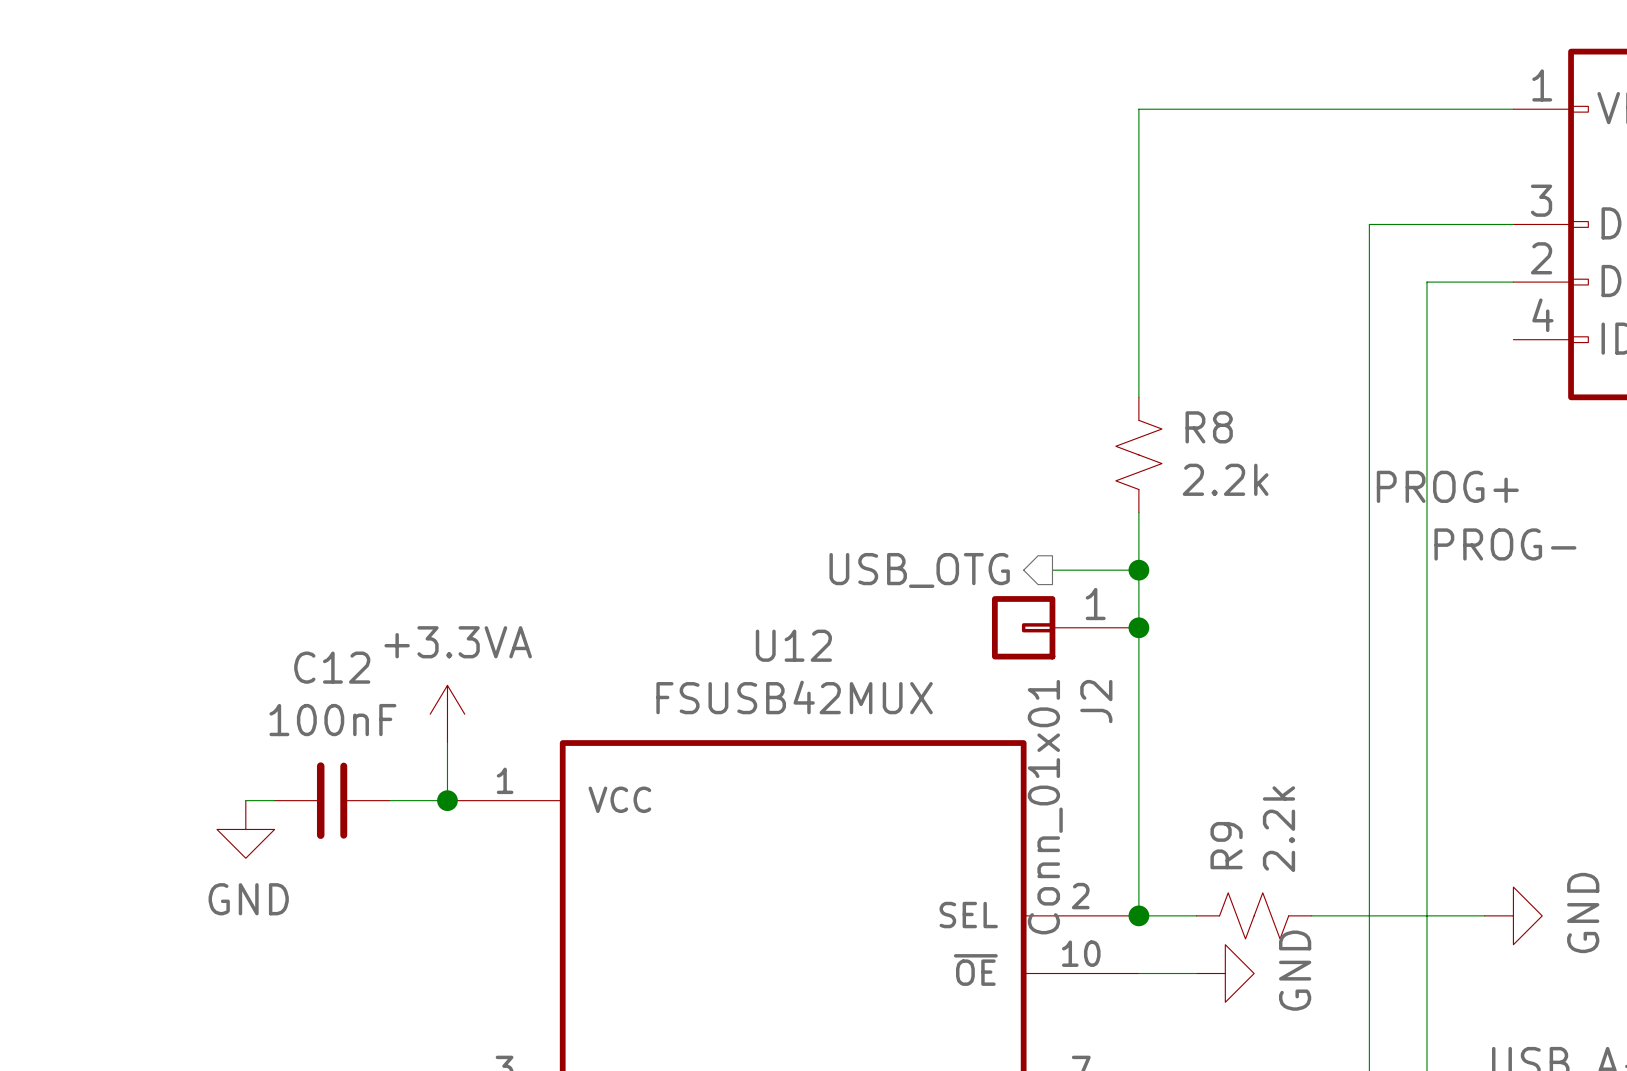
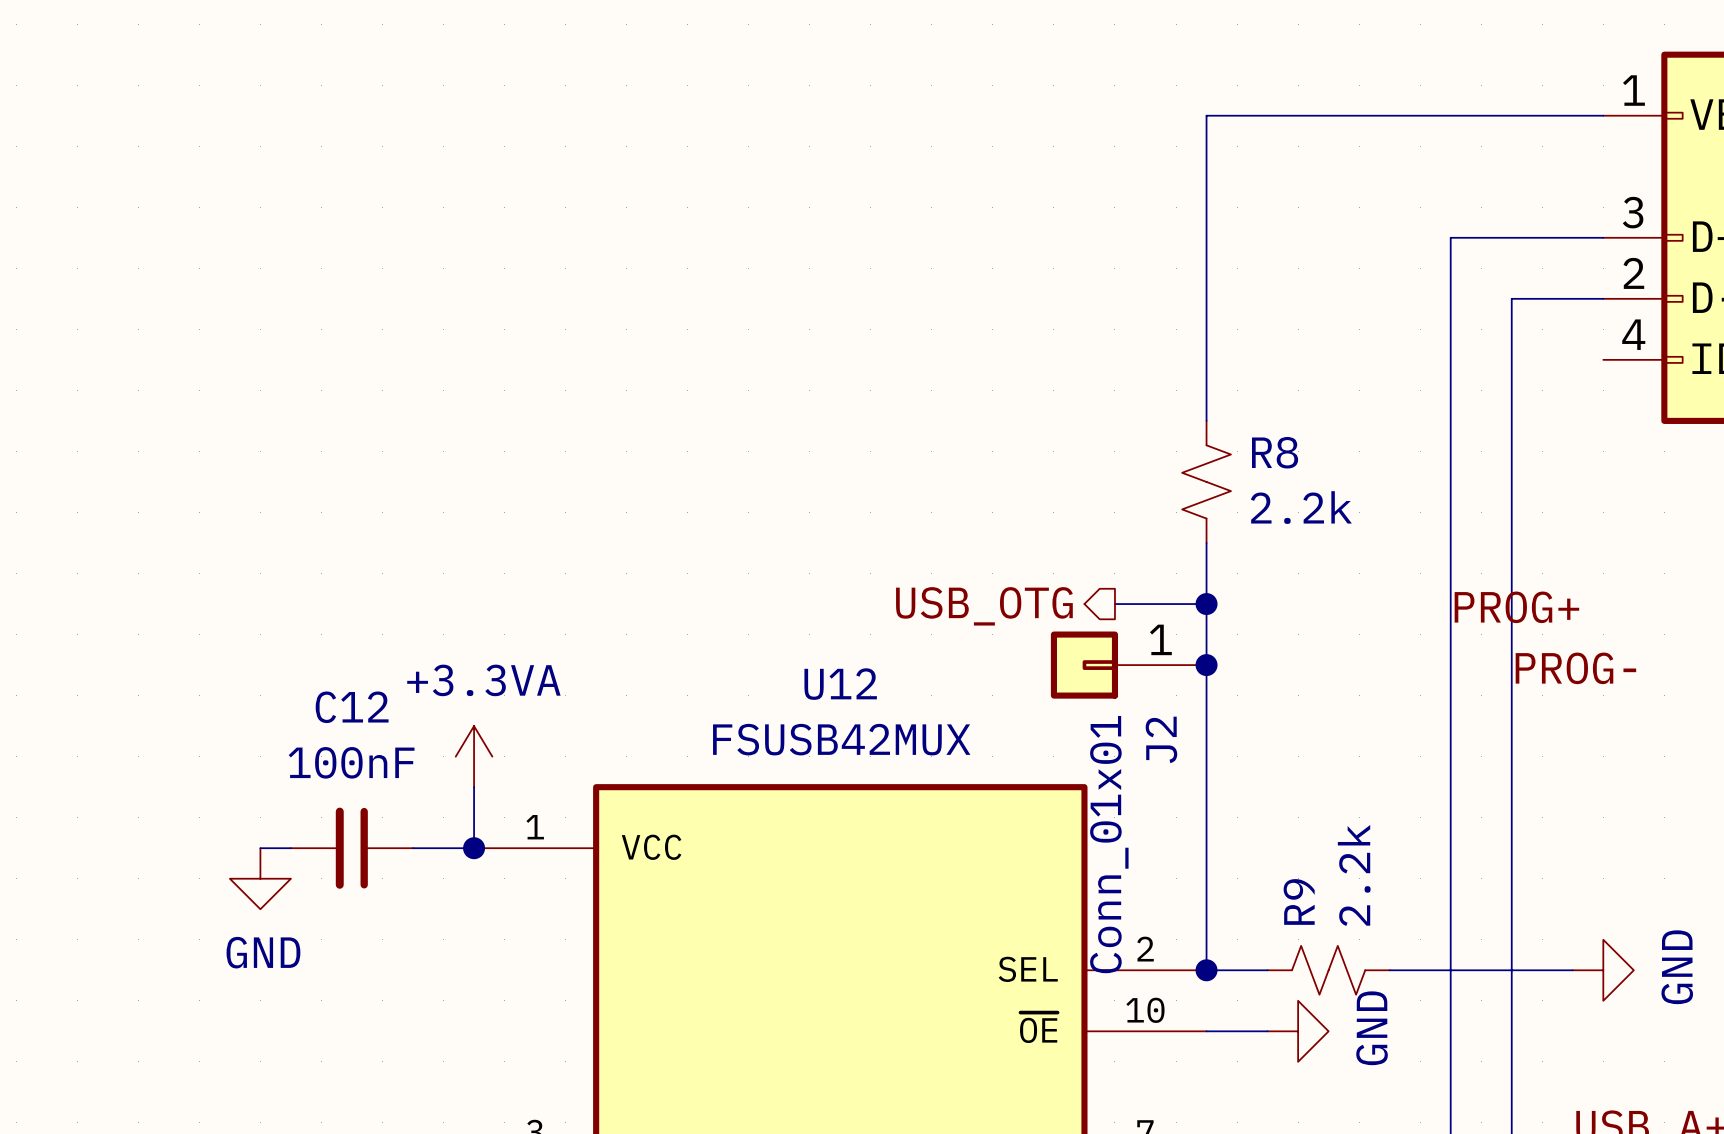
label position: PROG+ (1447, 486) -> PROG+ (1516, 607)
label position: PROG- (1505, 544) -> PROG- (1575, 668)

